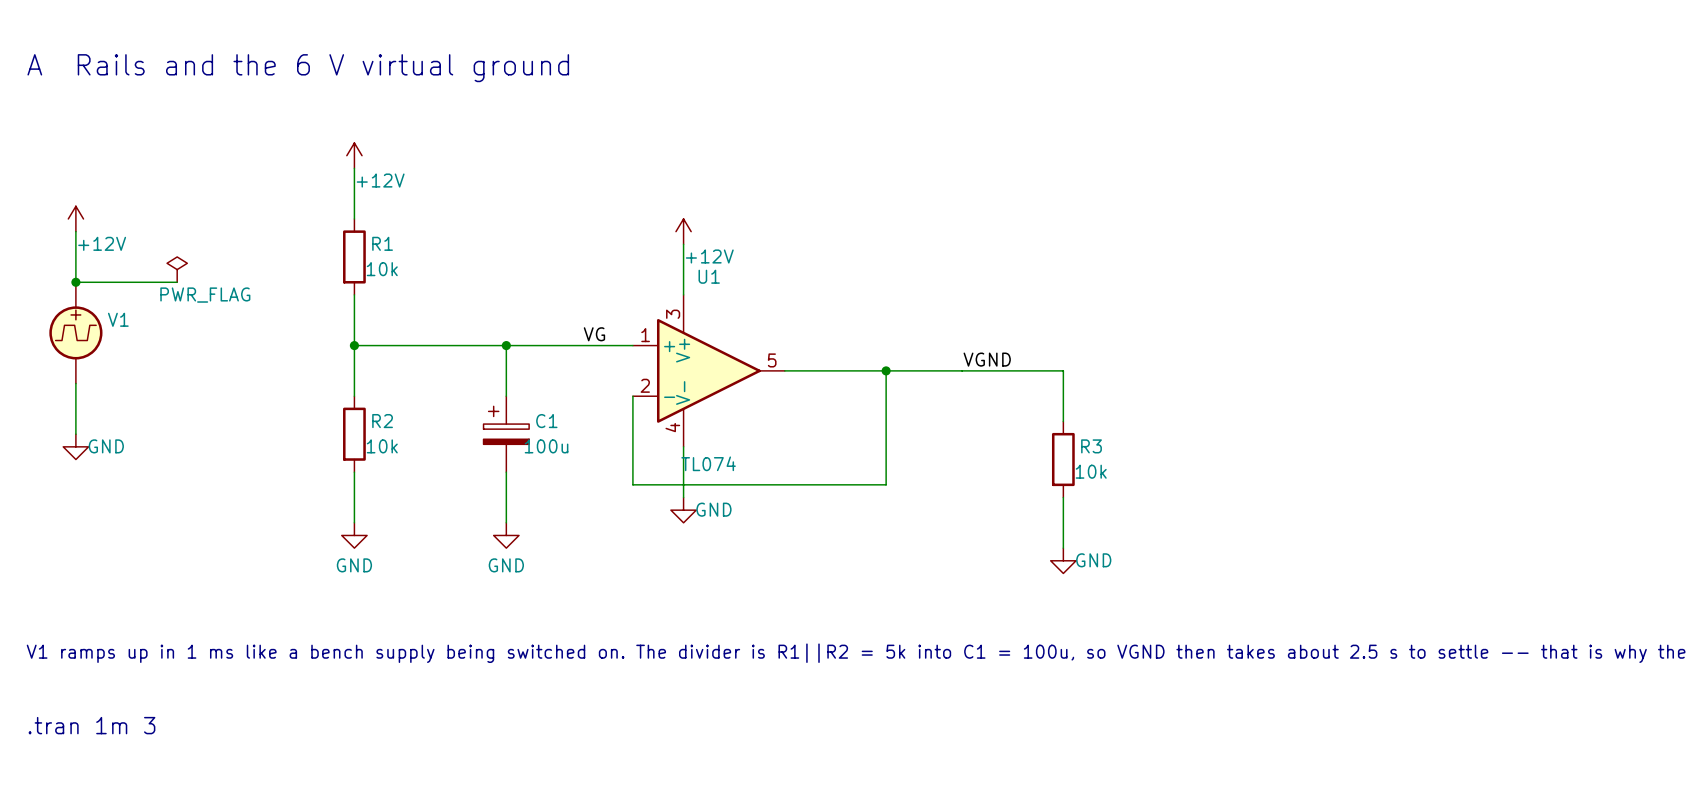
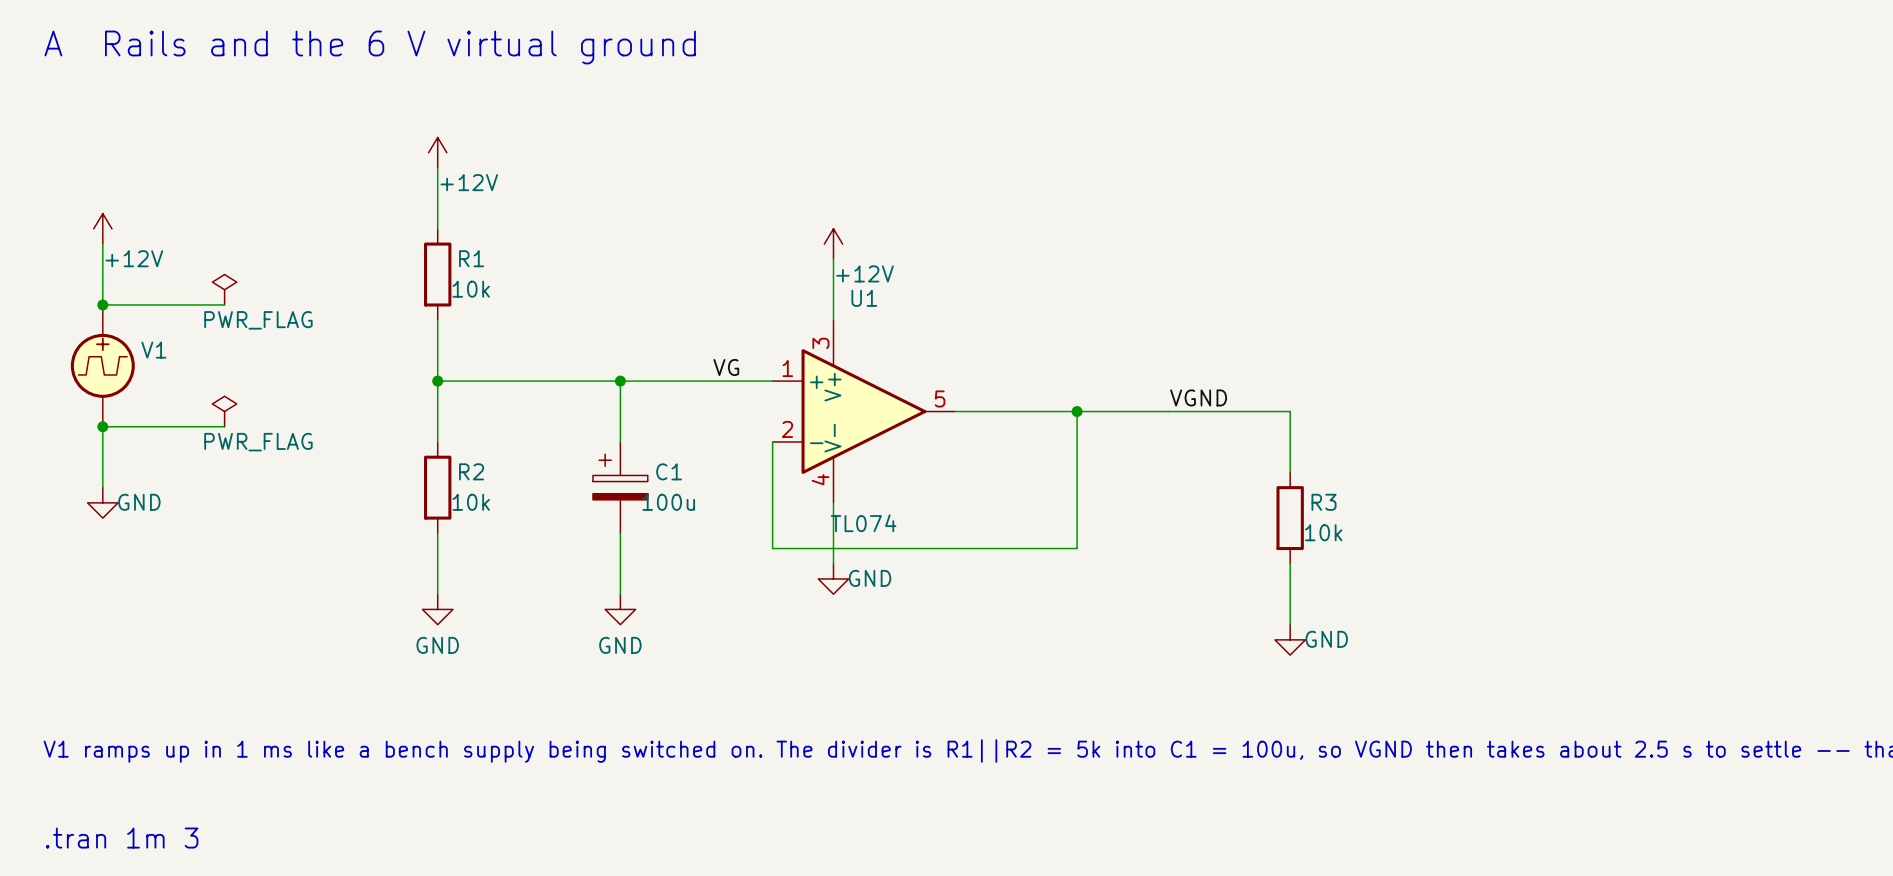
power symbol: none -> PWR_FLAG (224, 411)
wire: none -> (102, 426) (224, 426)
junction: none -> (102, 426)

